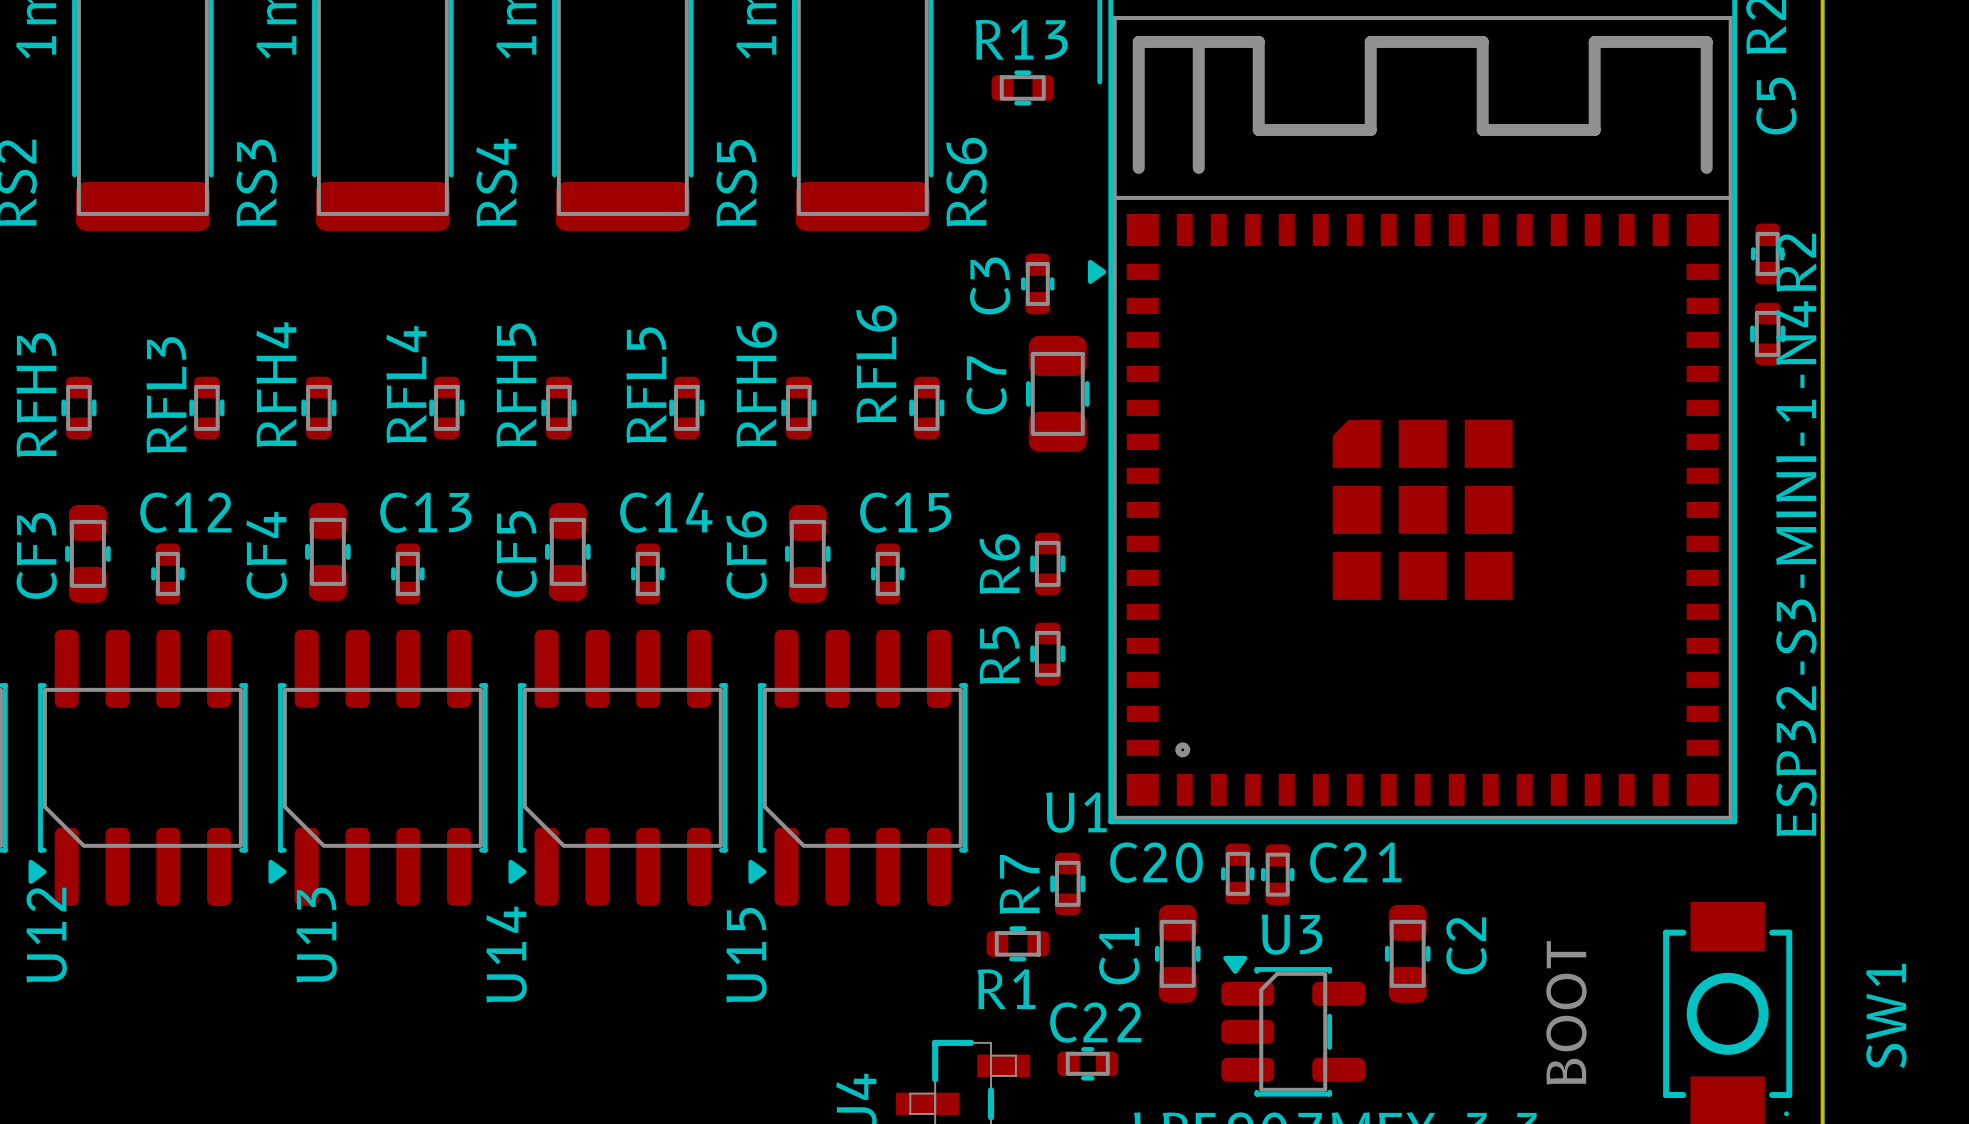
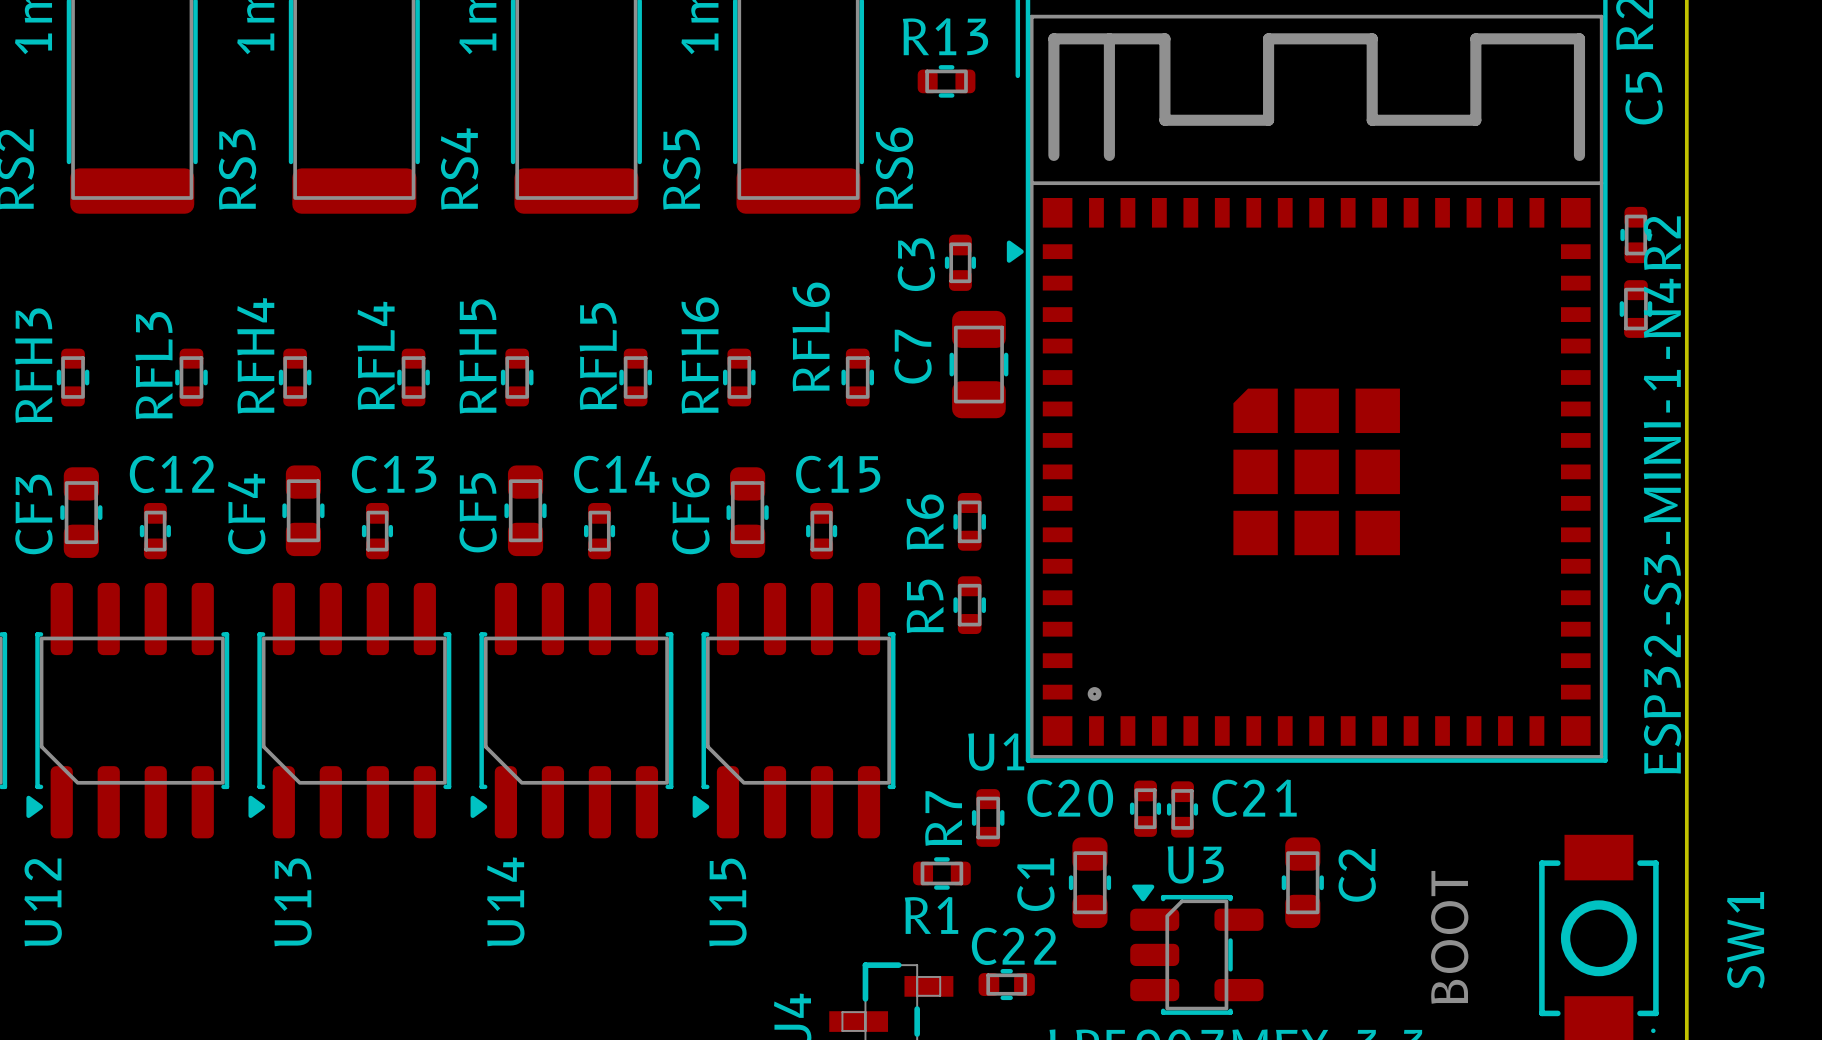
U12 name position: U12 (46, 935) -> U12 (43, 902)
U13 name position: U13 (316, 935) -> U13 (293, 902)
U14 name position: U14 (506, 954) -> U14 (505, 901)
U15 name position: U15 (746, 955) -> U15 (727, 902)

